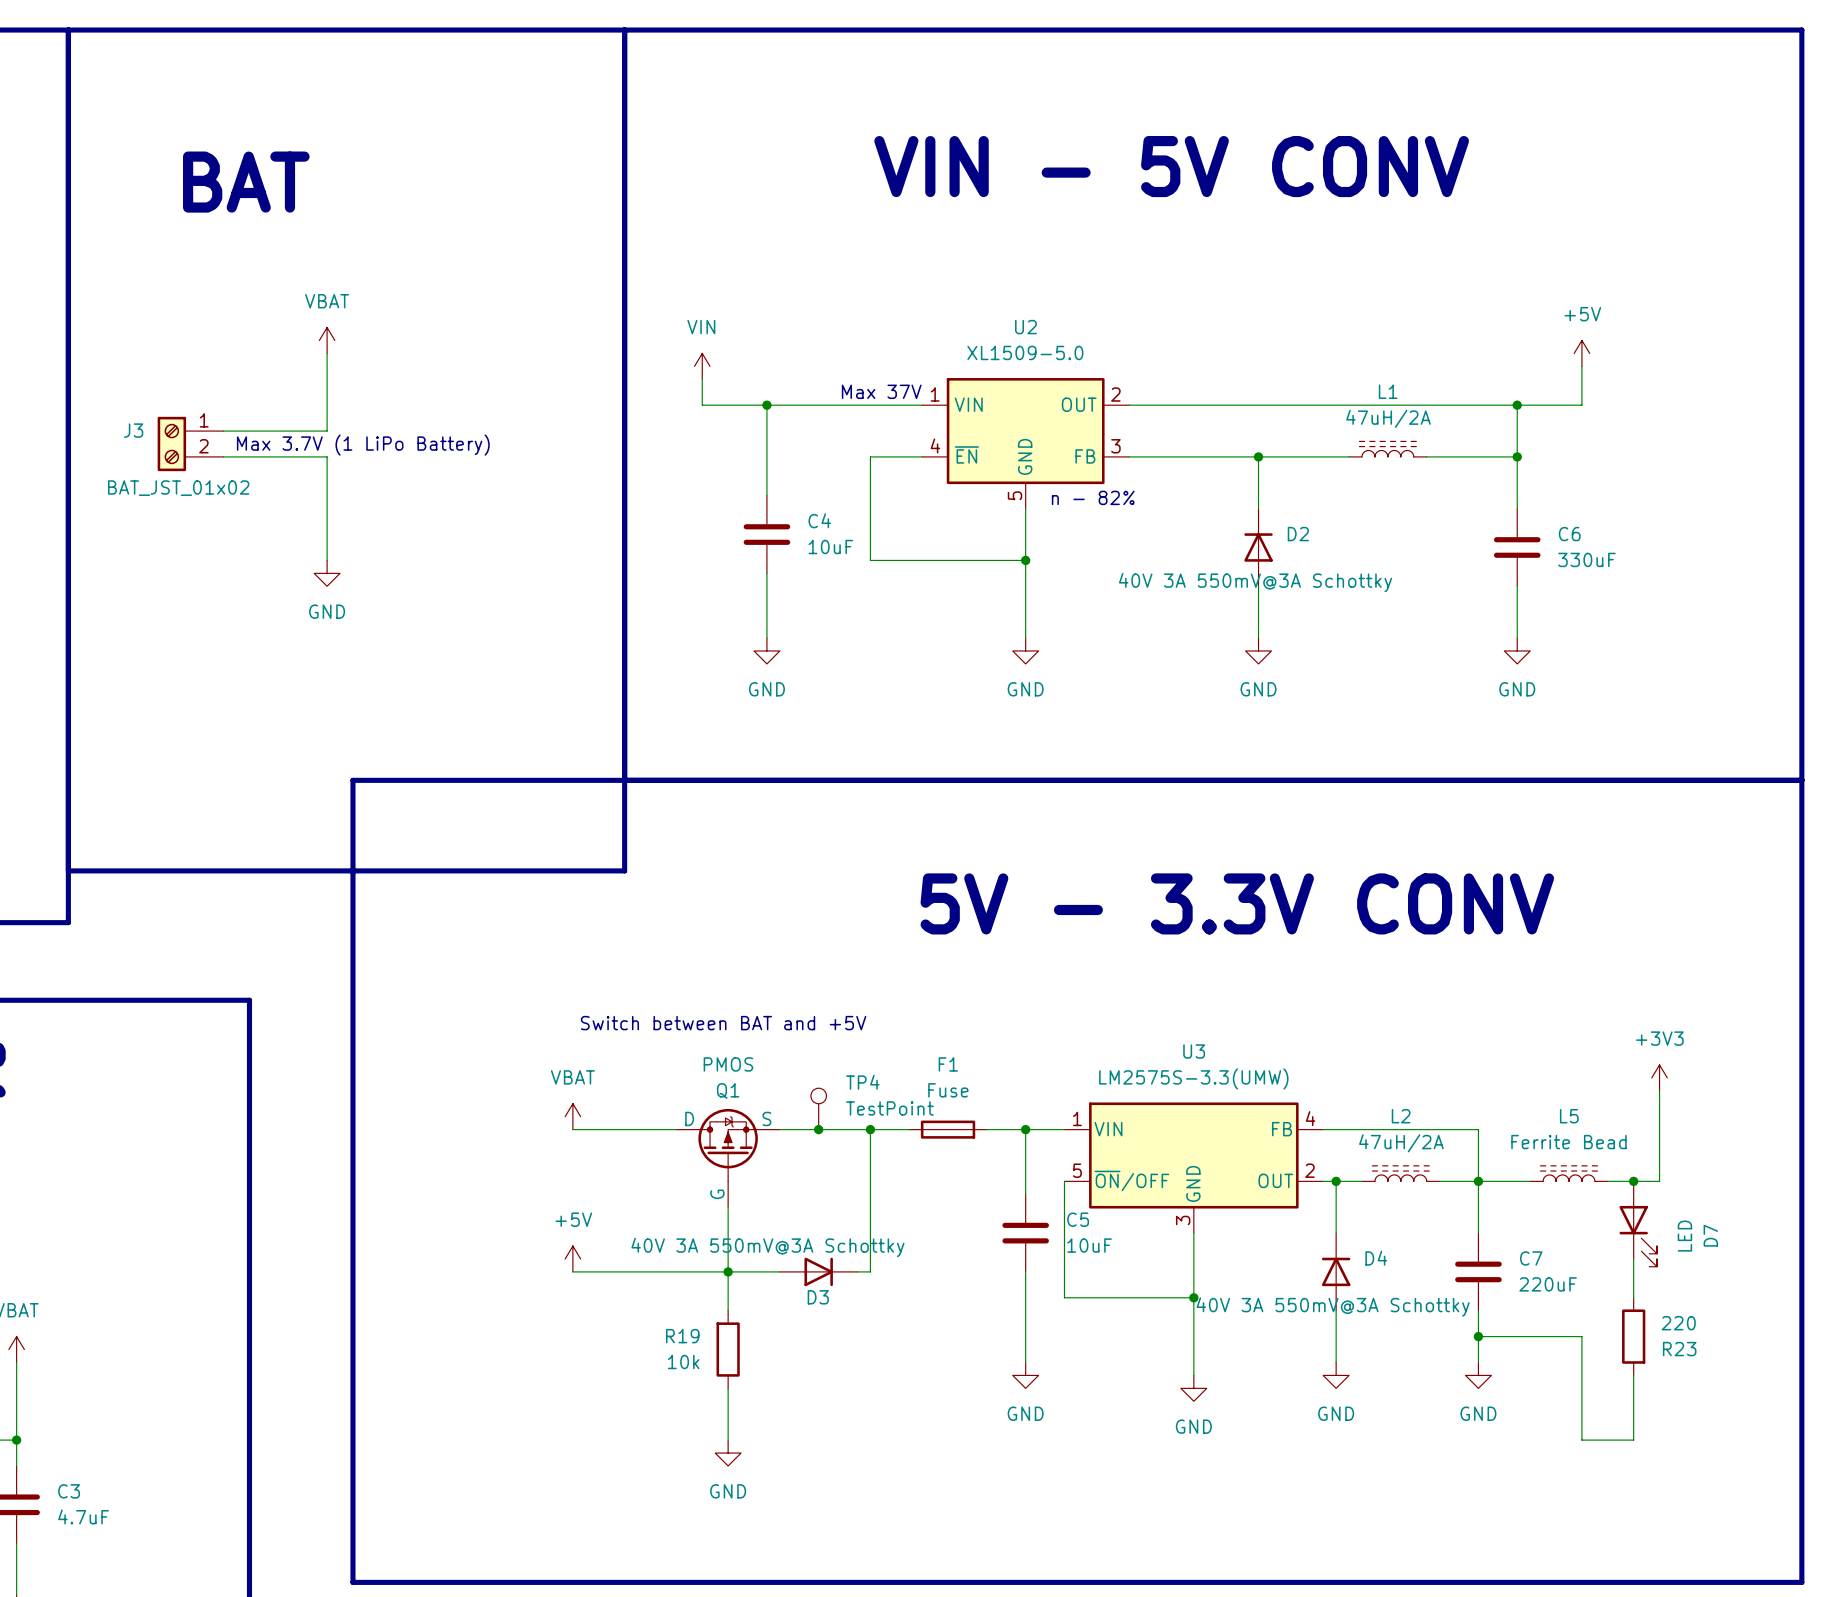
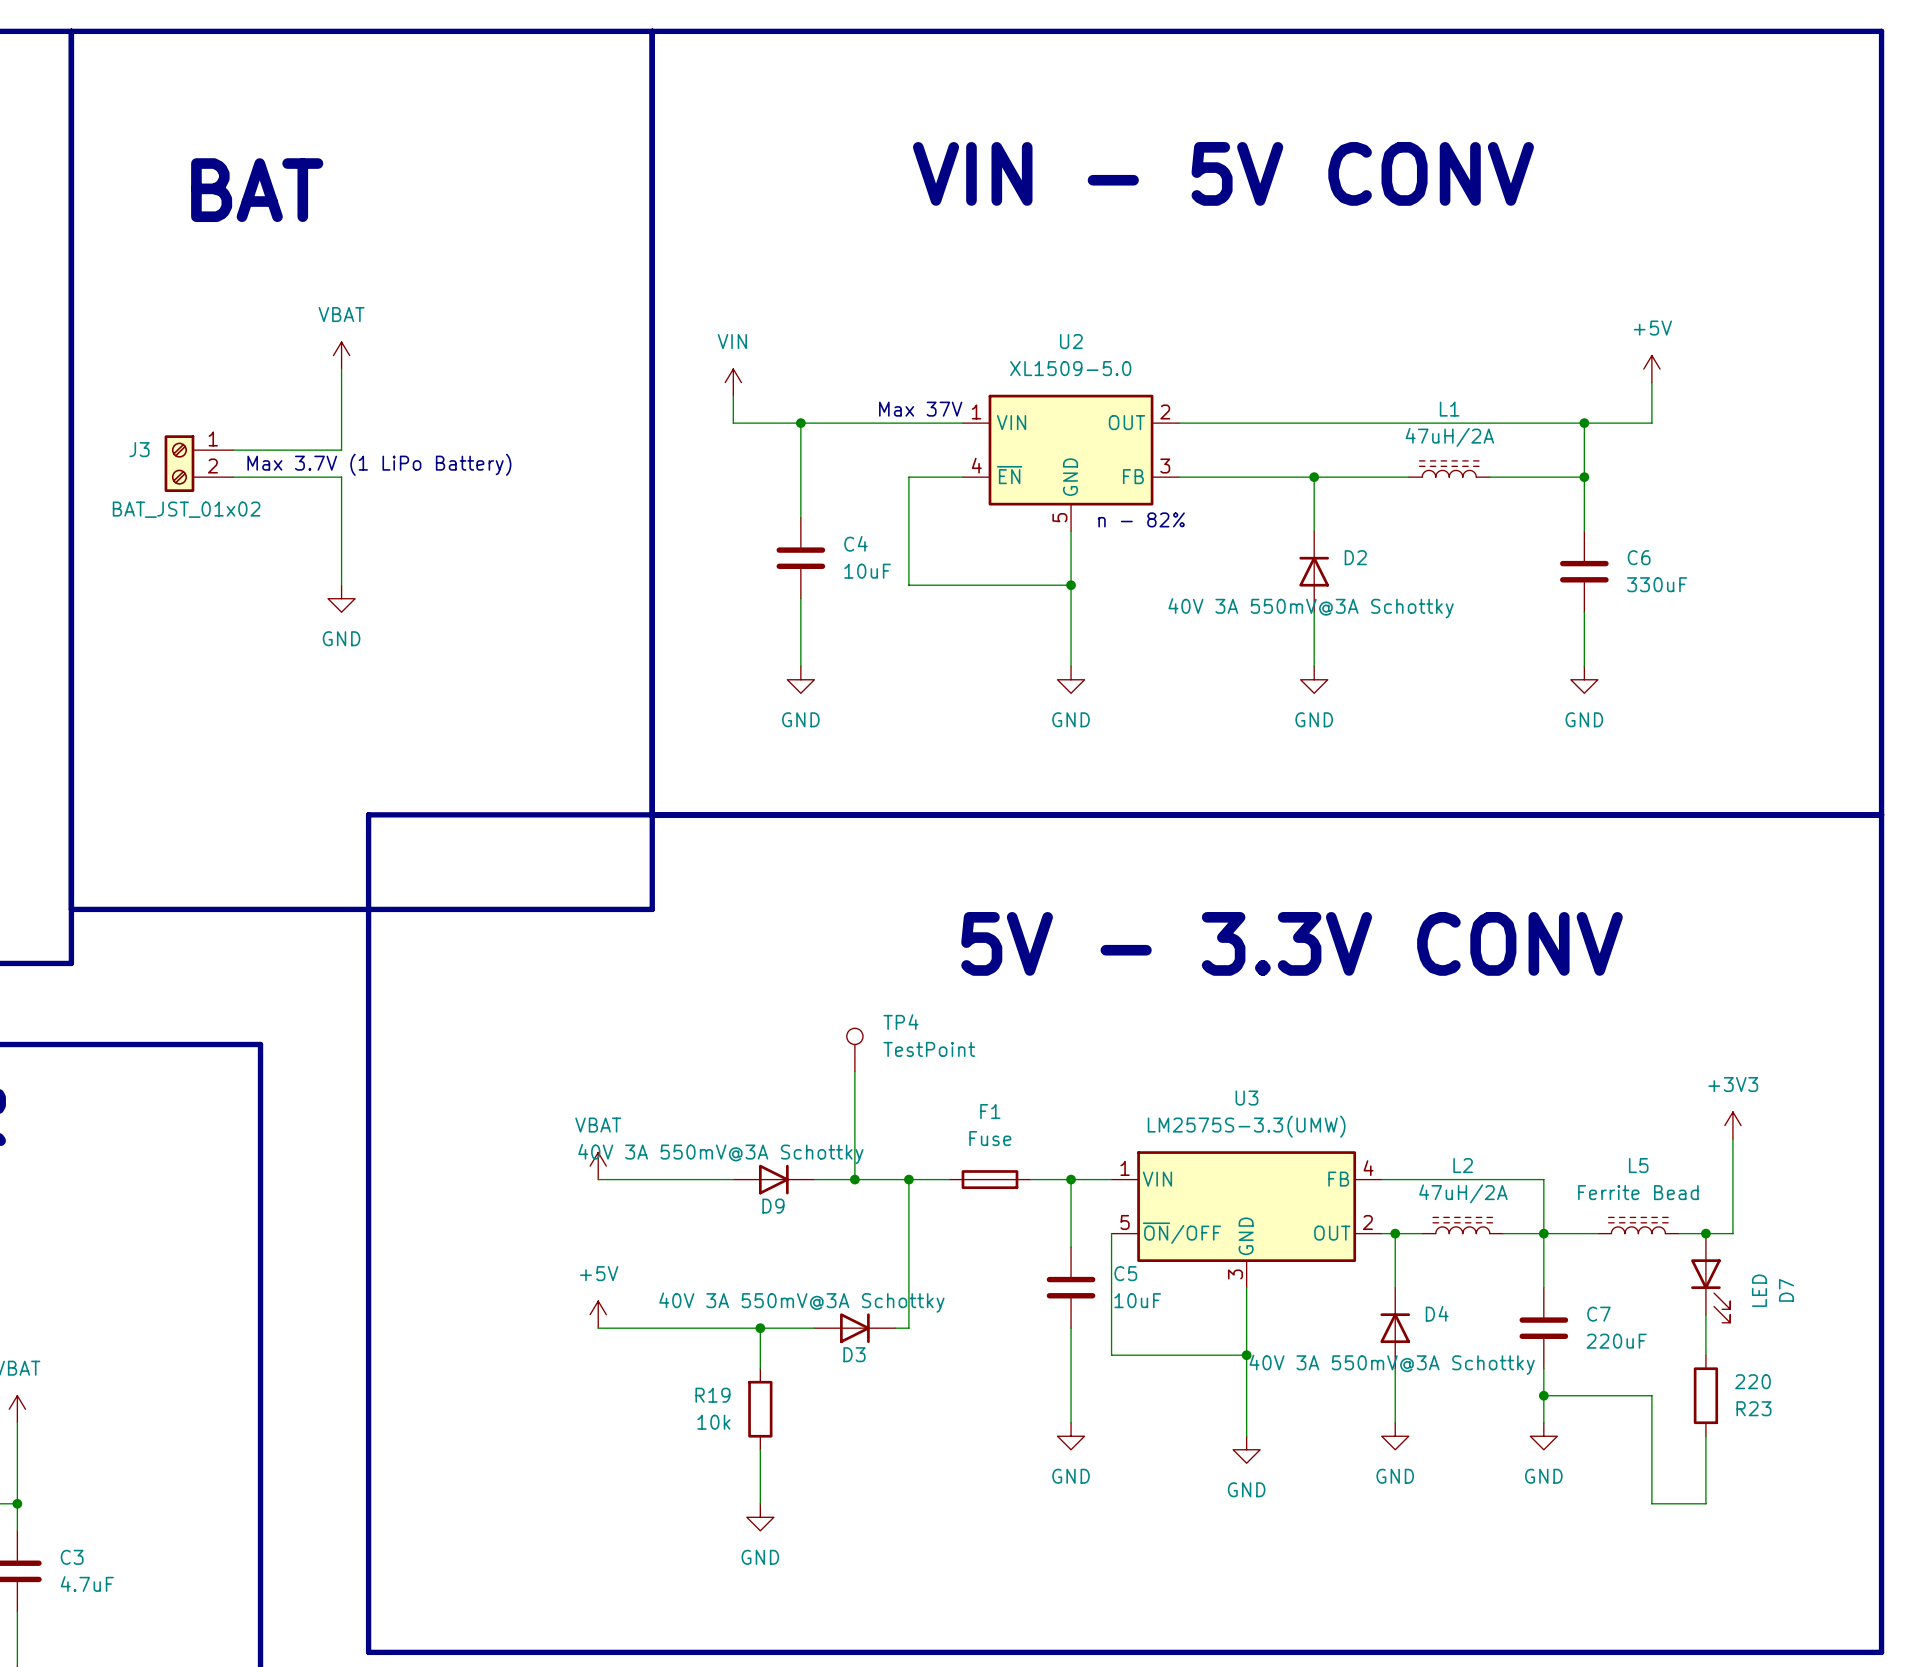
text: Switch between BAT and +5V (723, 1023) -> none
wire: none -> (854, 1071) (854, 1179)
TP4 position: (818, 1108) -> (854, 1049)
D9: none -> 40V 3A 550mV@3A Schottky (773, 1179)
Q1: PMOS (728, 1158) -> none
wire: (728, 1207) (728, 1271) -> none

